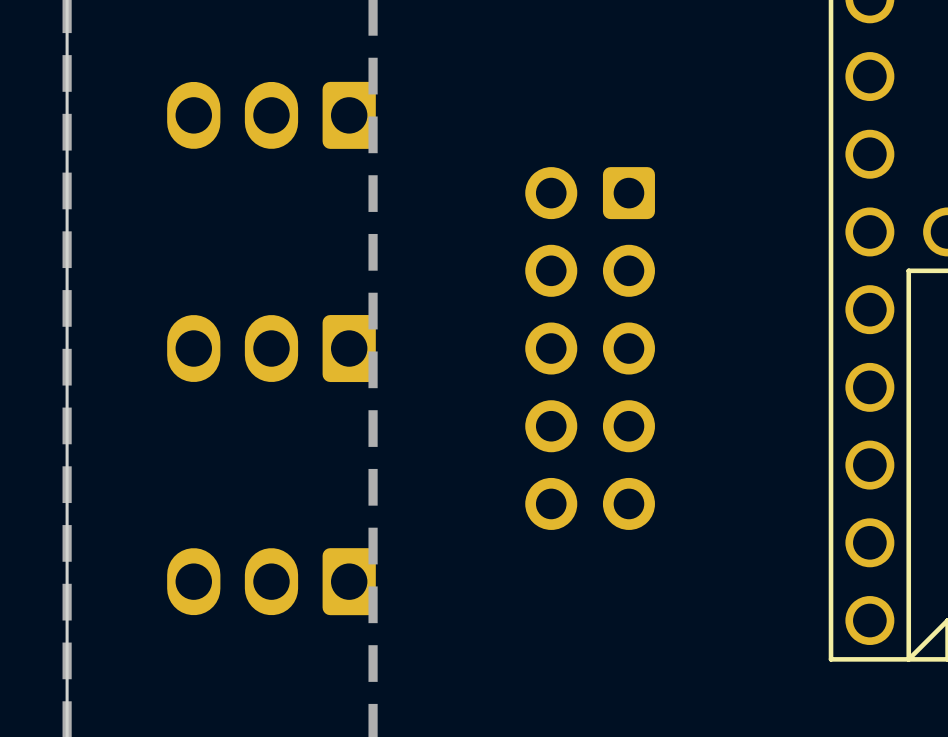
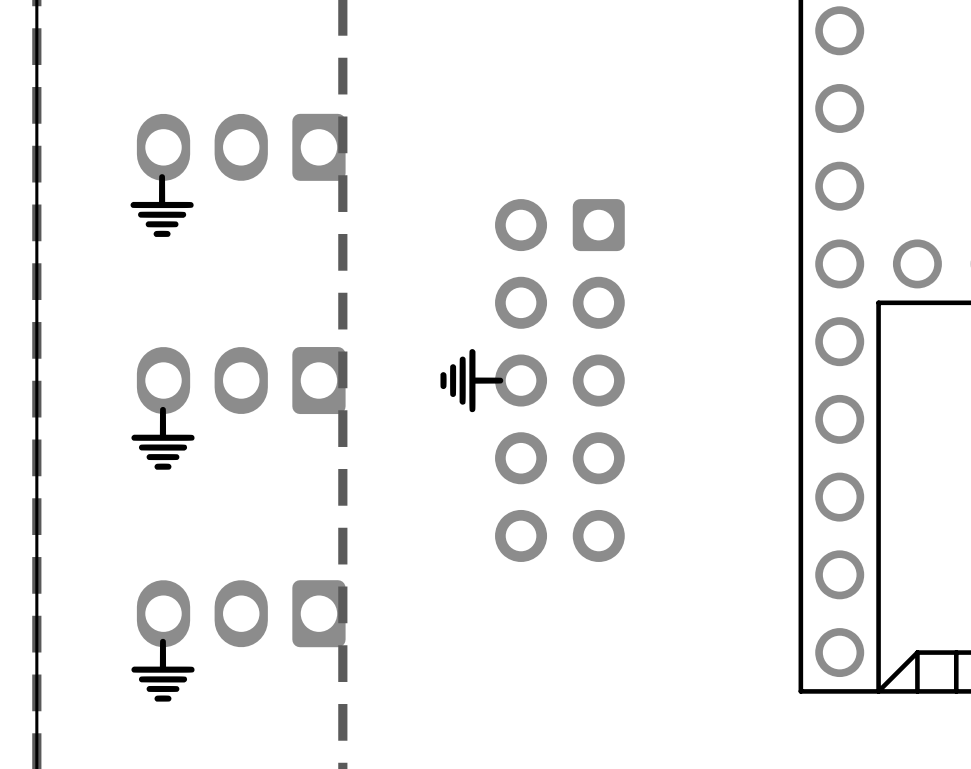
drawing: none -> [130, 174, 194, 237]
drawing: none -> [440, 349, 504, 413]
drawing: none -> [131, 406, 195, 470]
drawing: none -> [131, 638, 195, 702]

